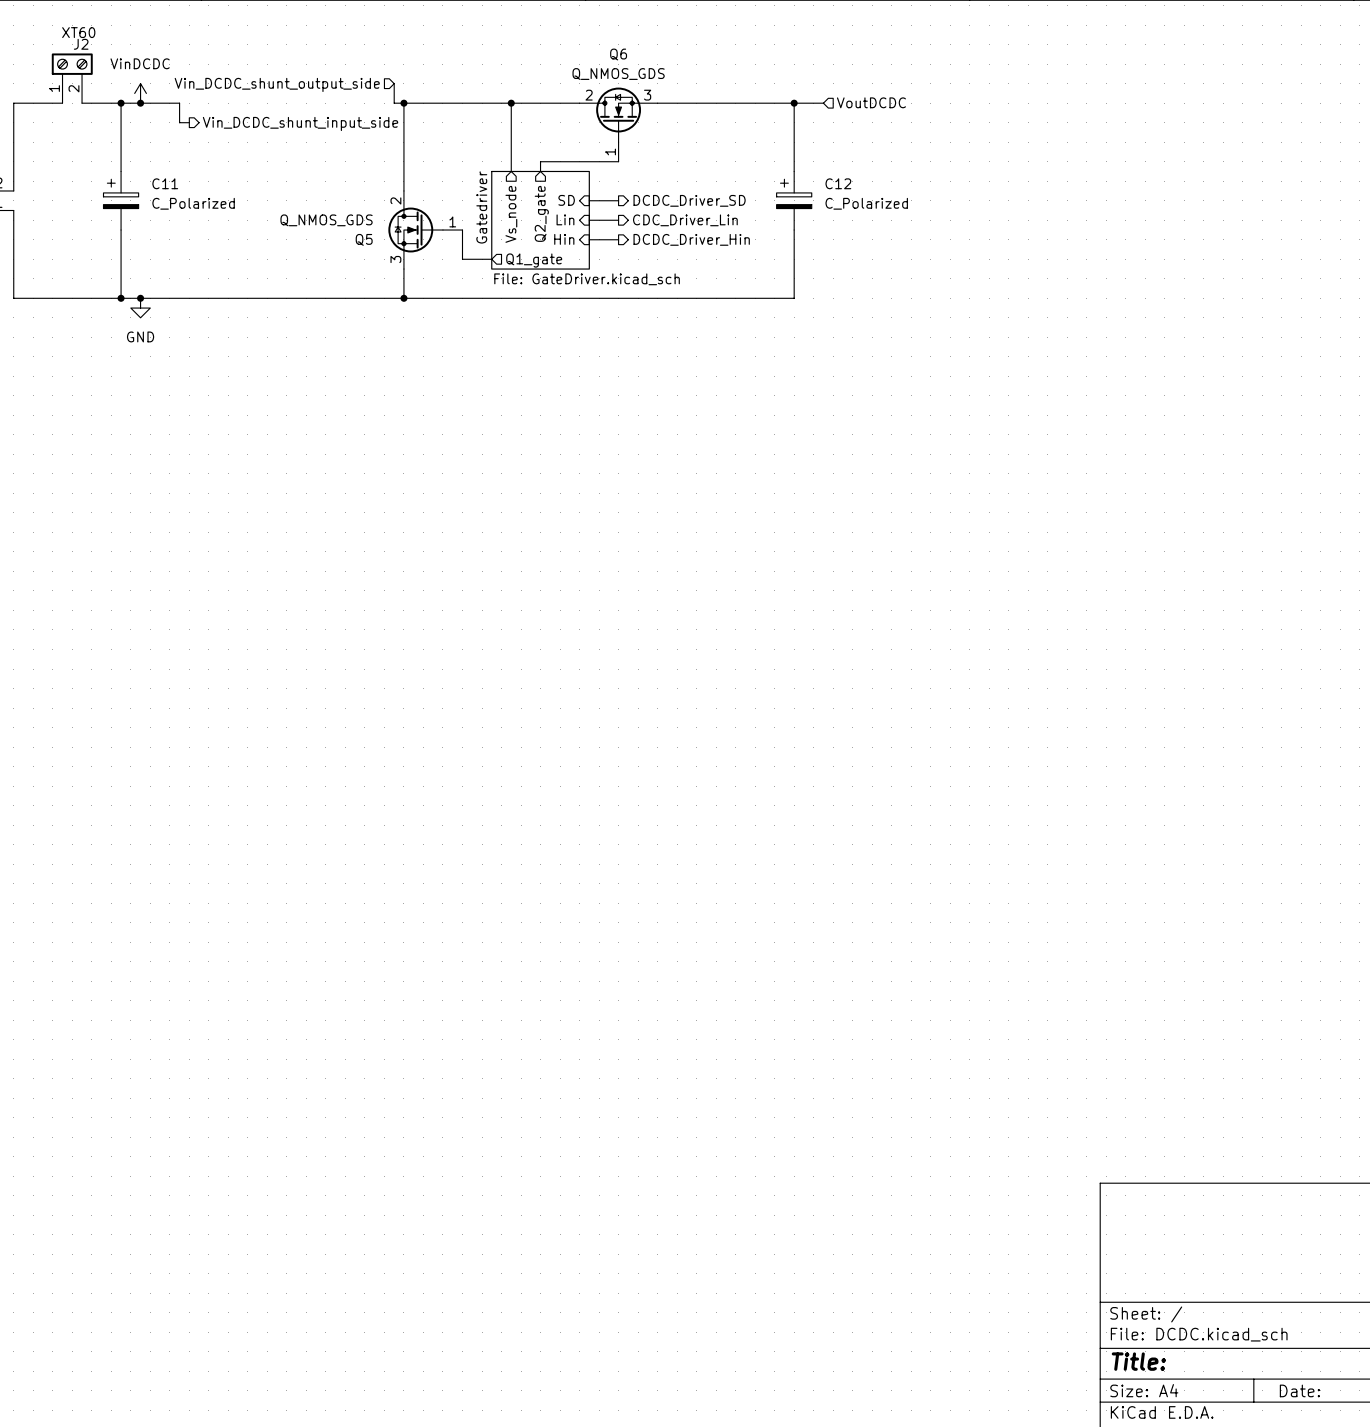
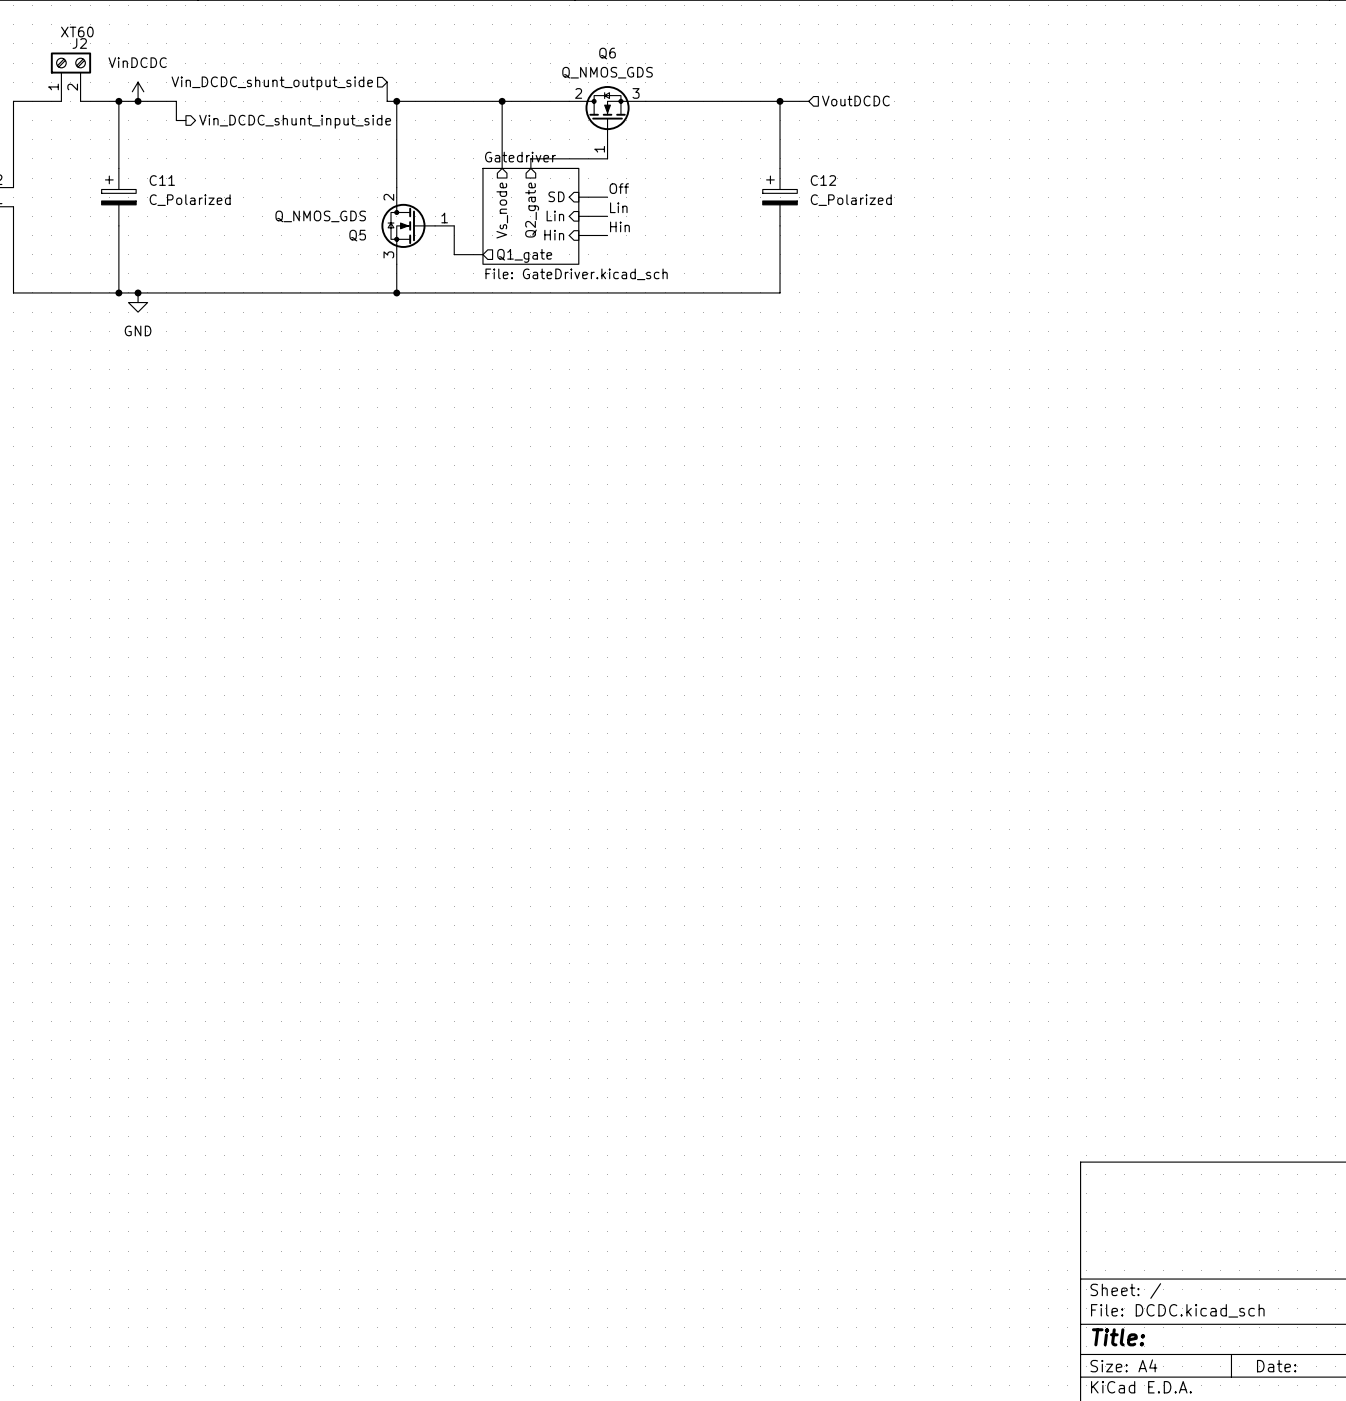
label: none -> Off (619, 188)
hierarchical label: DCDC_Driver_SD (689, 200) -> none
sheet Gatedriver name rotation: 0° (481, 207) -> 90° clockwise (520, 157)
label: none -> Lin (618, 207)
hierarchical label: CDC_Driver_Lin (685, 220) -> none
label: none -> Hin (619, 226)
hierarchical label: DCDC_Driver_Hin (691, 239) -> none

